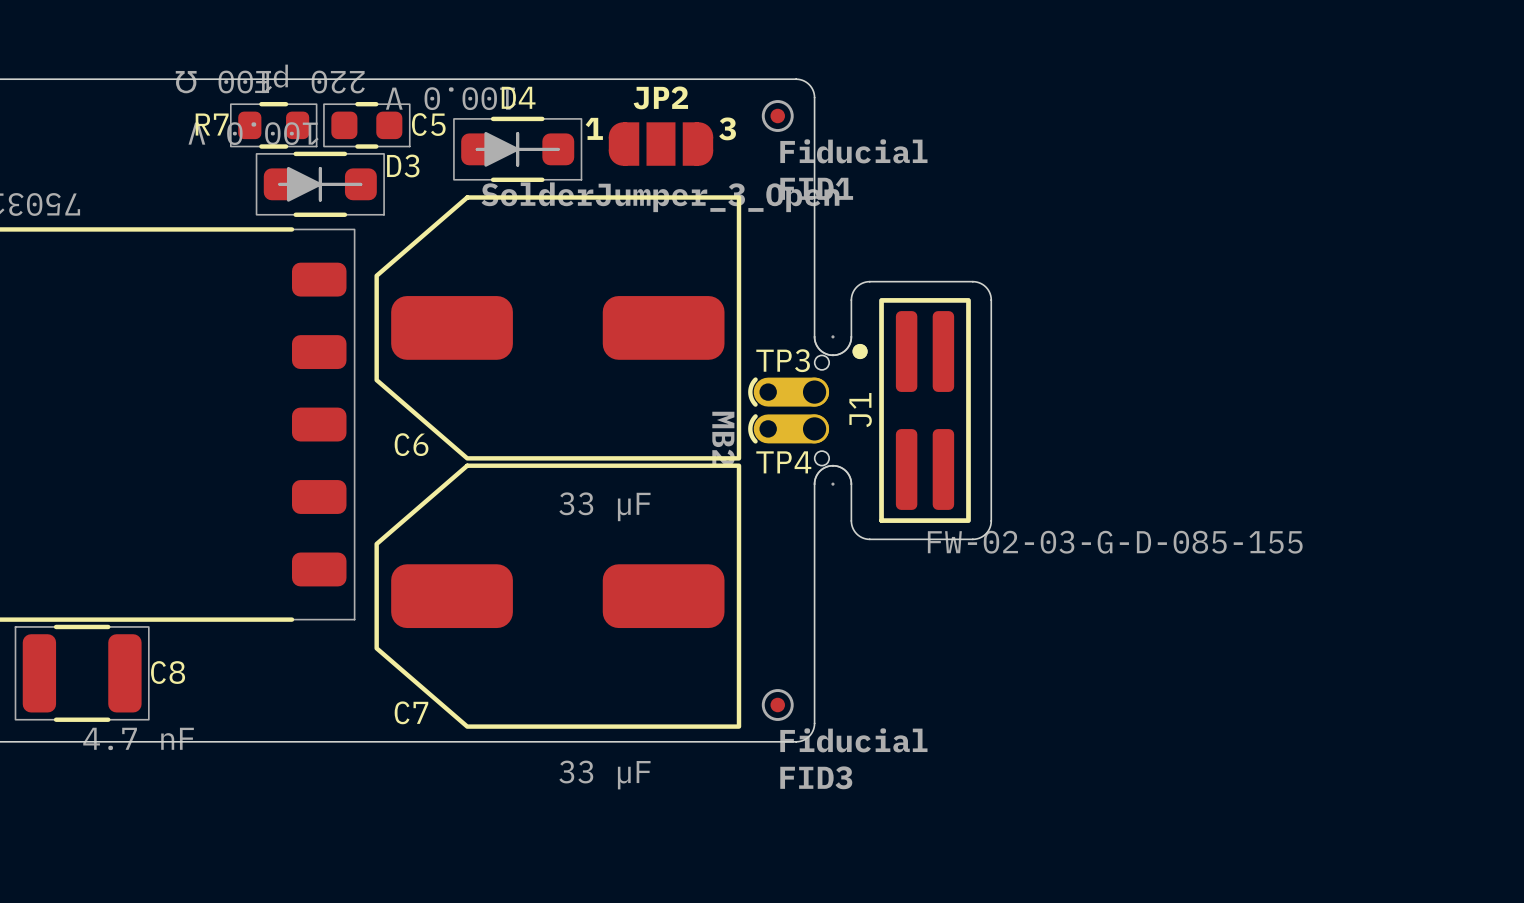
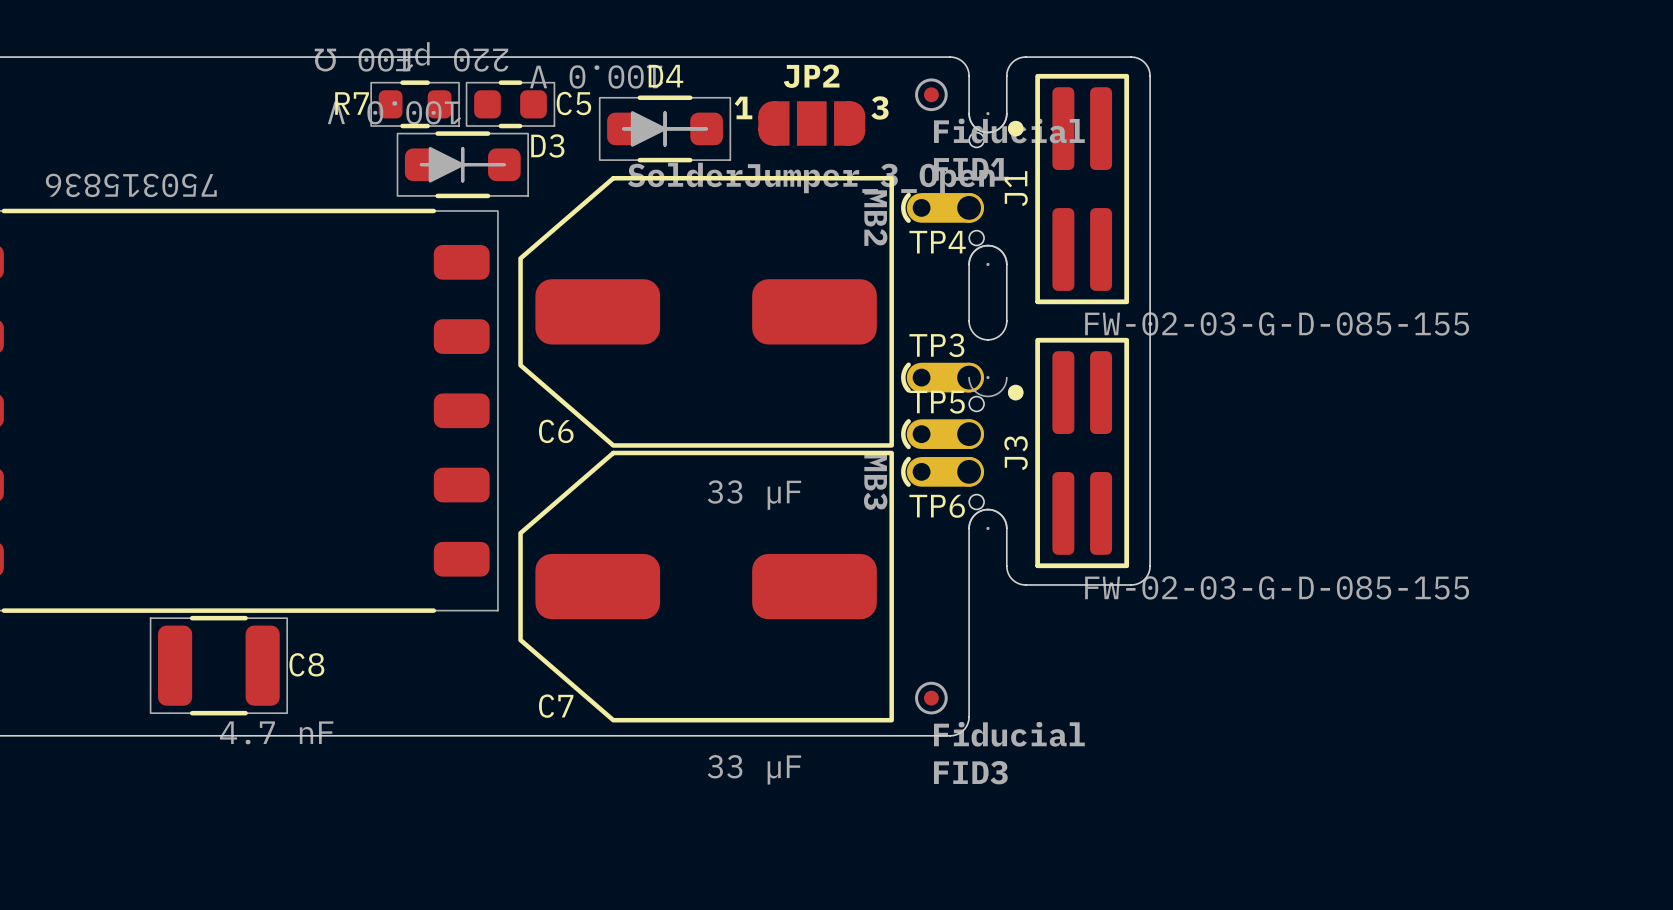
board edge: (814, 134) (814, 281) -> (1006, 283) (1005, 258) (996, 247) (985, 245) (977, 248) (970, 256) (969, 264)
board edge: (851, 300) (856, 287) (869, 281) (974, 281) (987, 288) (991, 300) -> (969, 113) (971, 123) (979, 130) (992, 132) (1001, 126) (1006, 115) (1007, 71) (1010, 64) (1019, 58) (1131, 57) (1144, 62) (1150, 75) (1150, 283)
MB2 position: (832, 410) -> (987, 189)
J1 position: (911, 410) -> (1068, 189)
TP4 position: (788, 428) -> (942, 207)
TP5: none -> (942, 434)
MB3: none -> (987, 452)
J3: none -> FW-02-03-G-D-085-155 (1068, 452)
TP6: none -> (942, 471)
board edge: (991, 520) (987, 532) (974, 539) (863, 538) (855, 532) (851, 525) (849, 476) (842, 468) (830, 465) (821, 469) (815, 480) (814, 539) -> (1150, 509) (1149, 570) (1142, 580) (1133, 584) (1019, 583) (1010, 577) (1007, 570) (1006, 526) (1001, 515) (992, 510) (979, 511) (971, 518) (969, 528)

